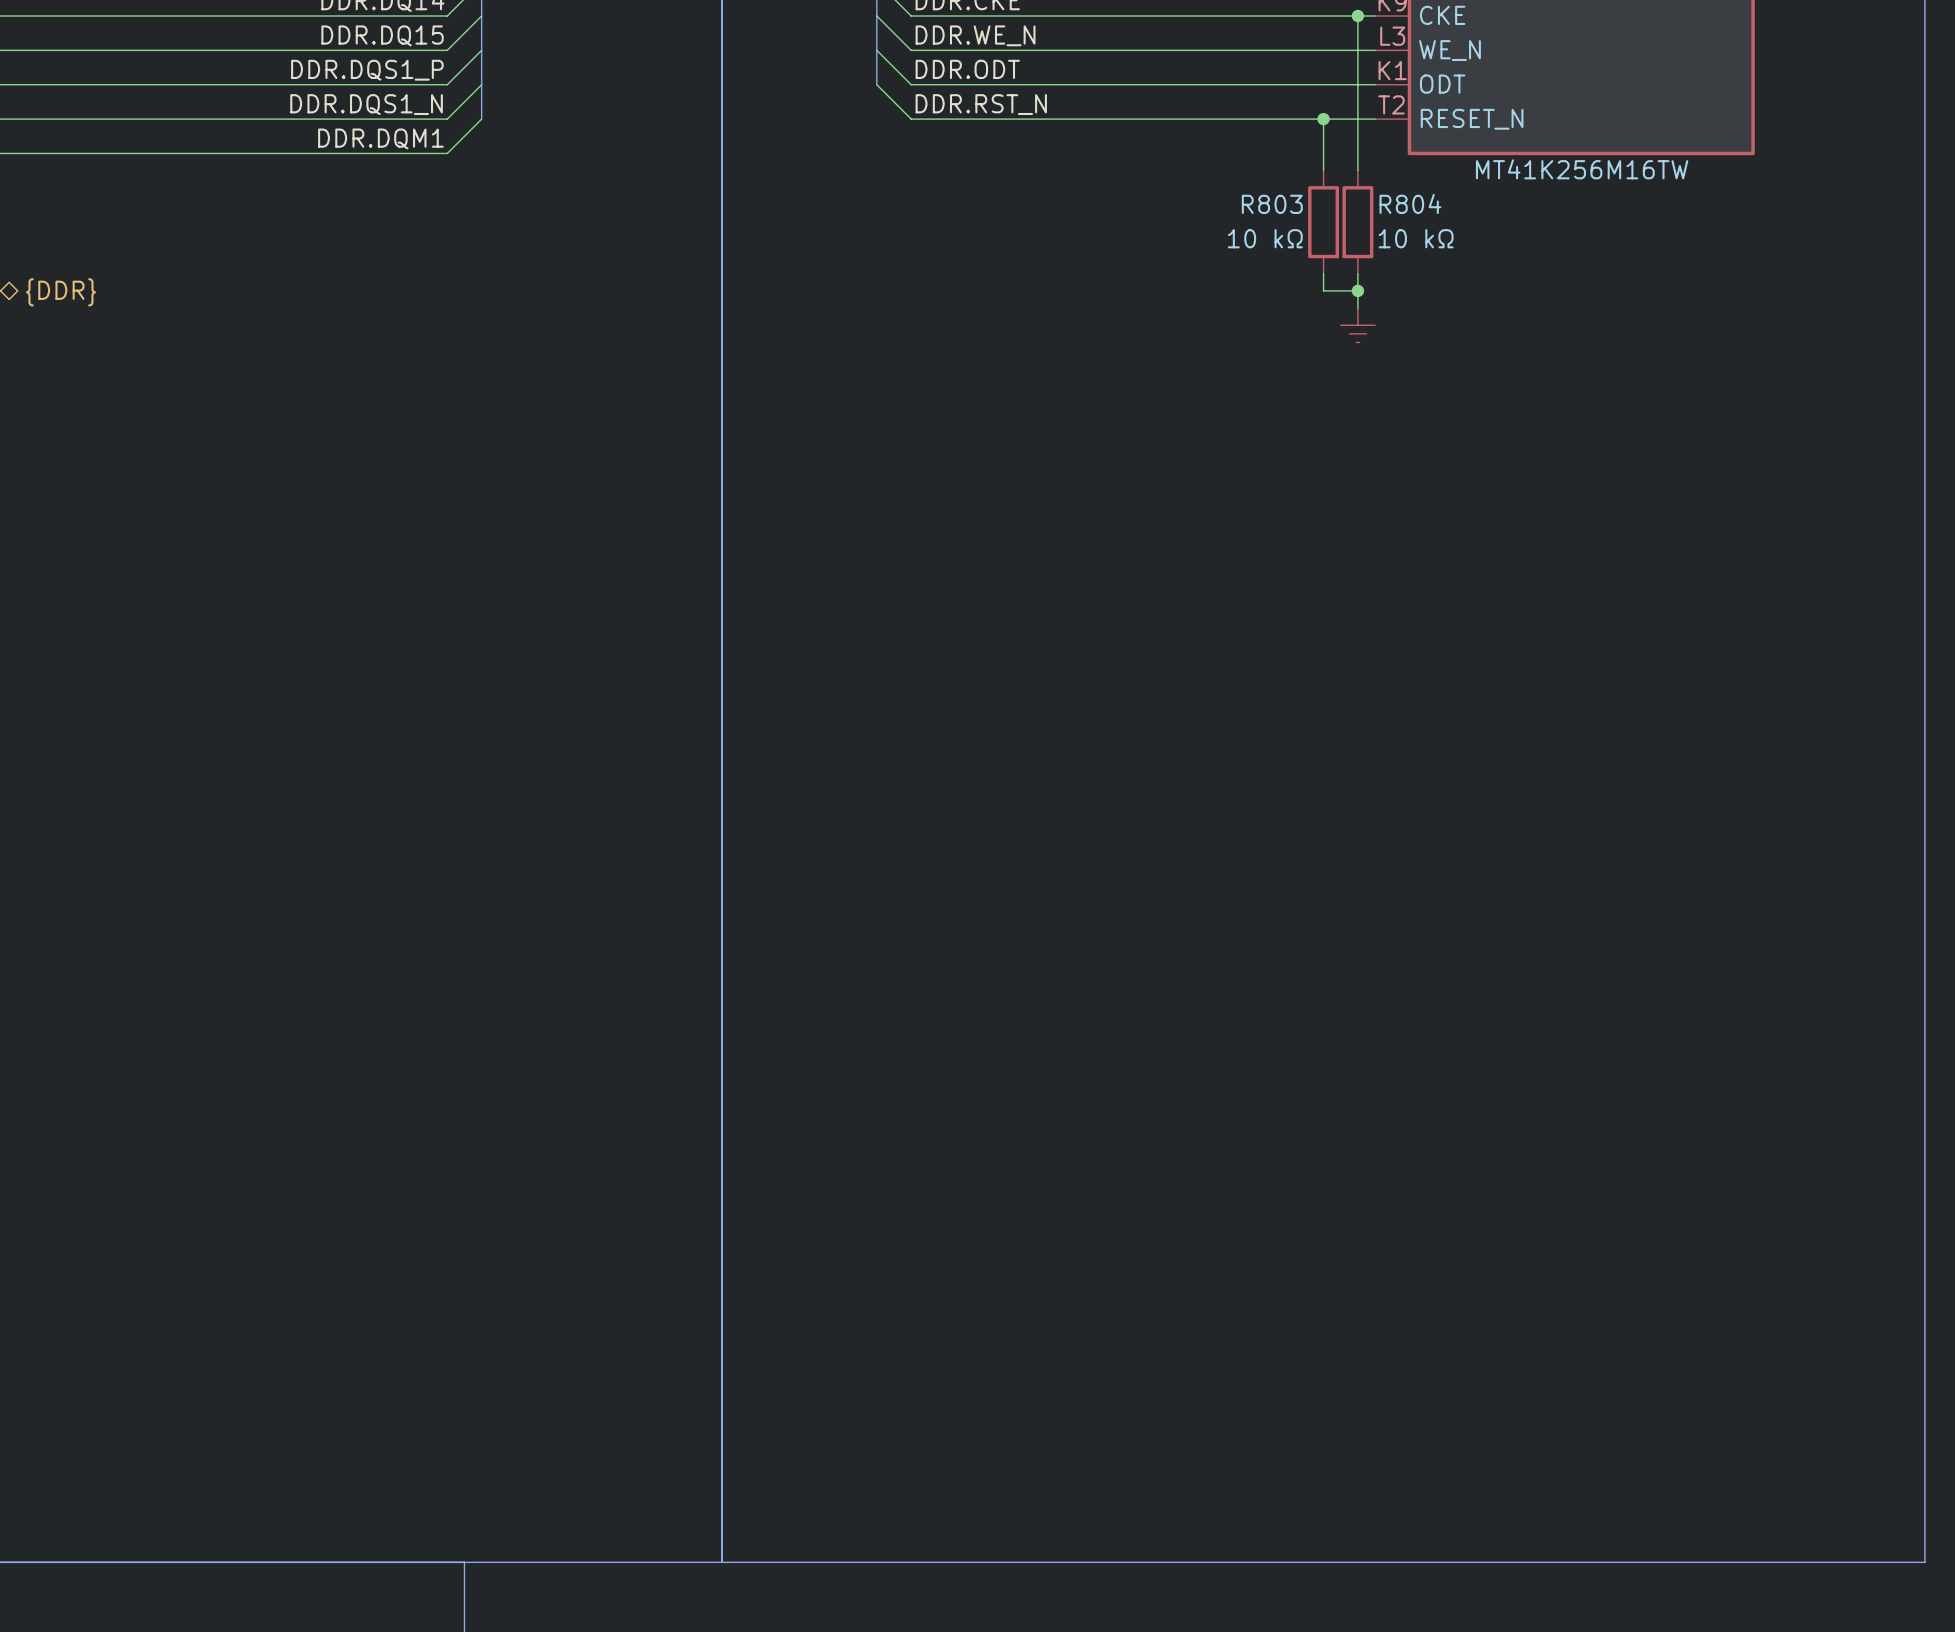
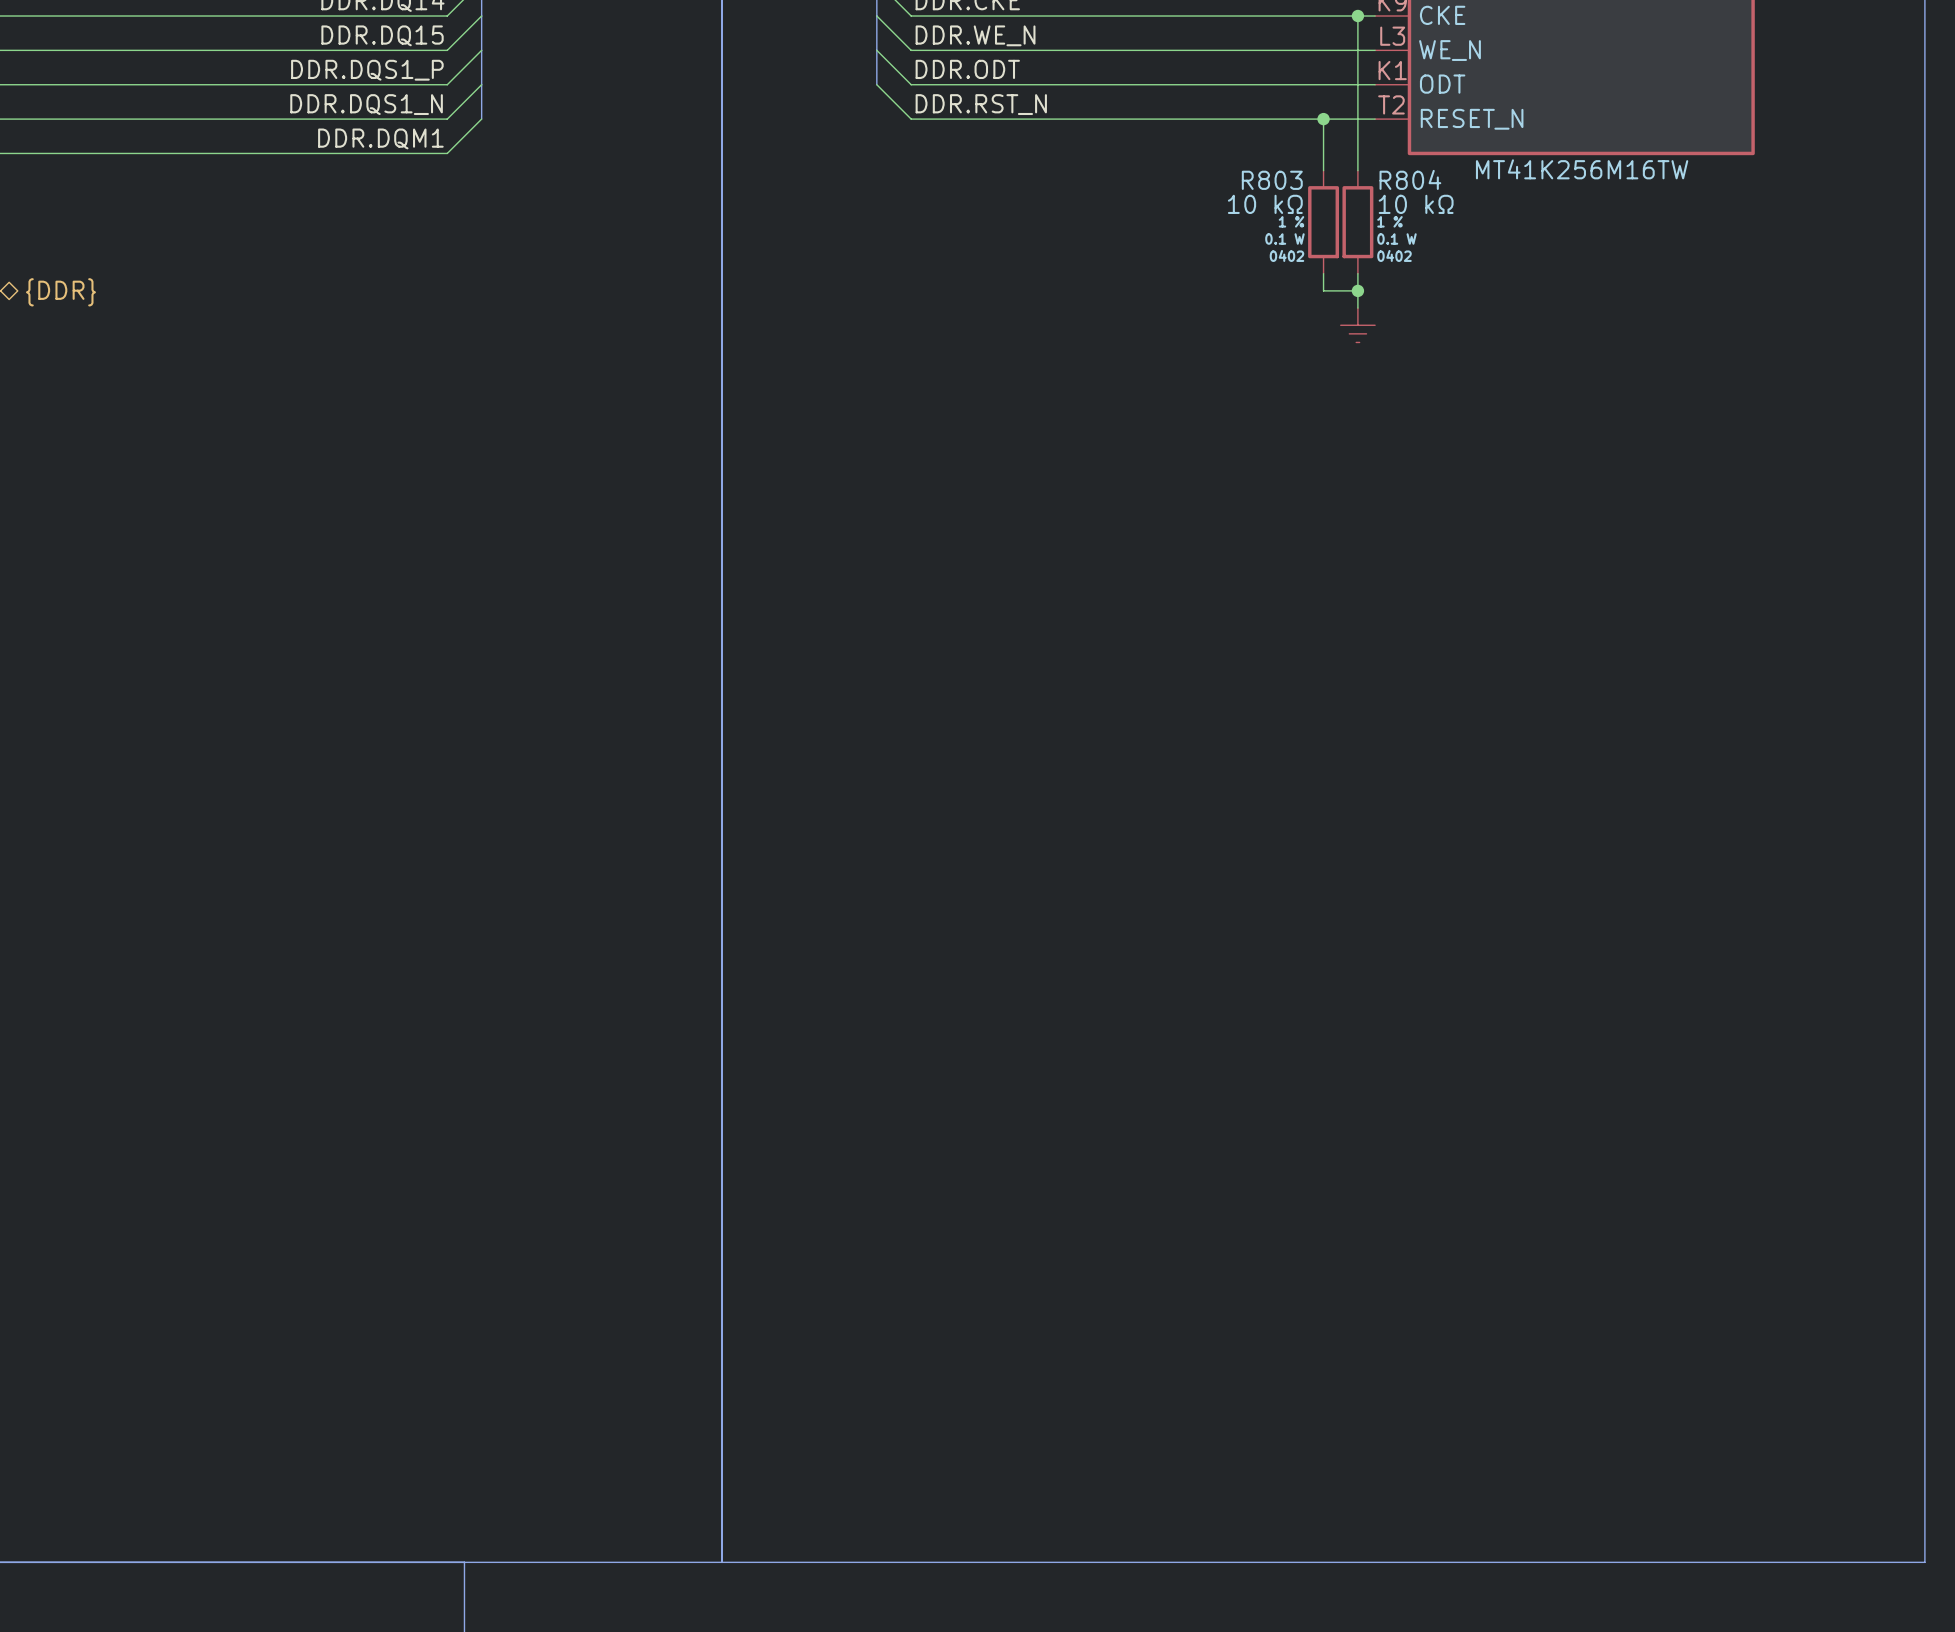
R804 name position: R804 (1410, 203) -> R804 (1410, 179)
R803 name position: R803 (1272, 204) -> R803 (1272, 180)
R803 text: none -> 1 % (1291, 221)
R804 text: none -> 1 % (1389, 221)
R803 value position: 10 kΩ (1265, 238) -> 10 kΩ (1265, 204)
R804 value position: 10 kΩ (1416, 238) -> 10 kΩ (1416, 204)
R803 text: none -> 0.1 W (1284, 239)
R804 text: none -> 0.1 W (1396, 239)
R803 text: none -> 0402 (1286, 255)
R804 text: none -> 0402 (1394, 255)

